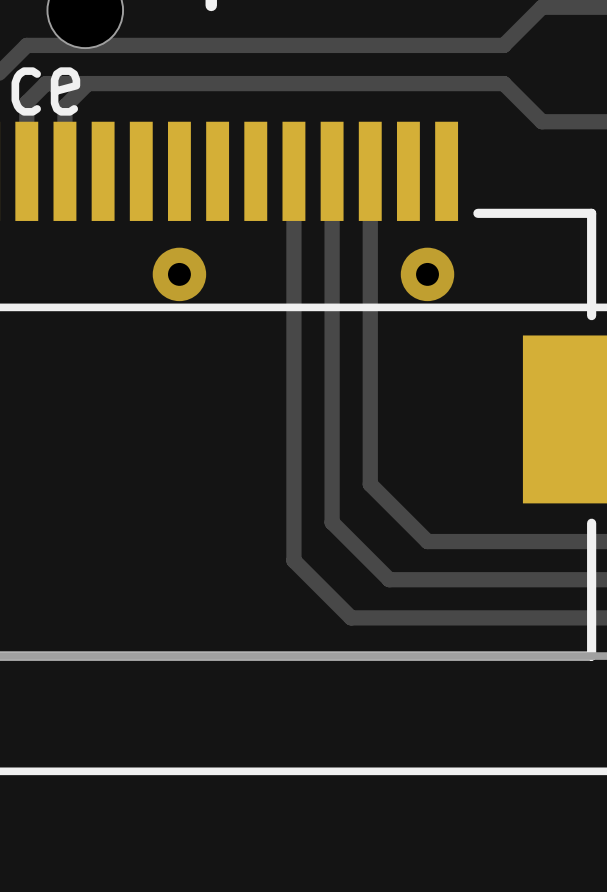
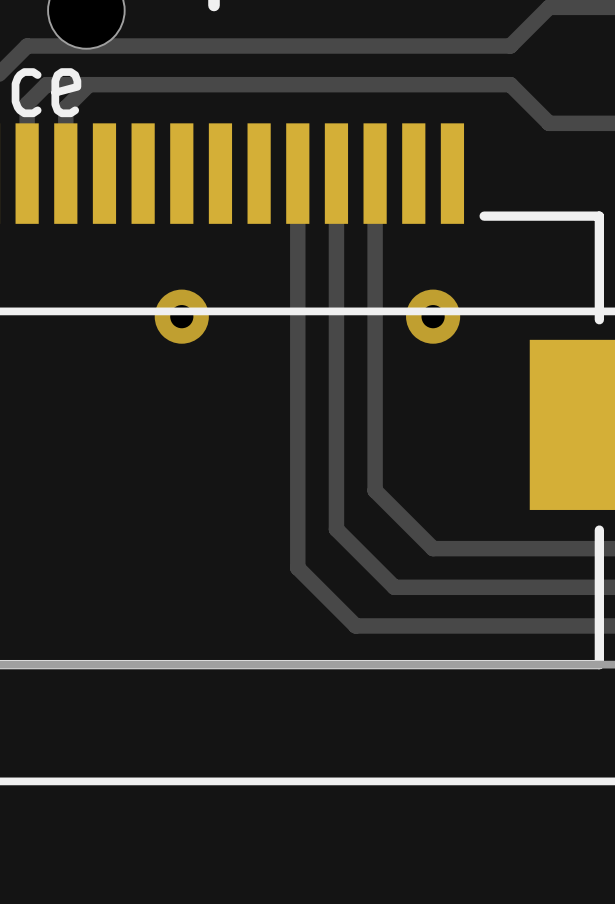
via position: (179, 274) -> (181, 316)
via position: (427, 274) -> (433, 316)

